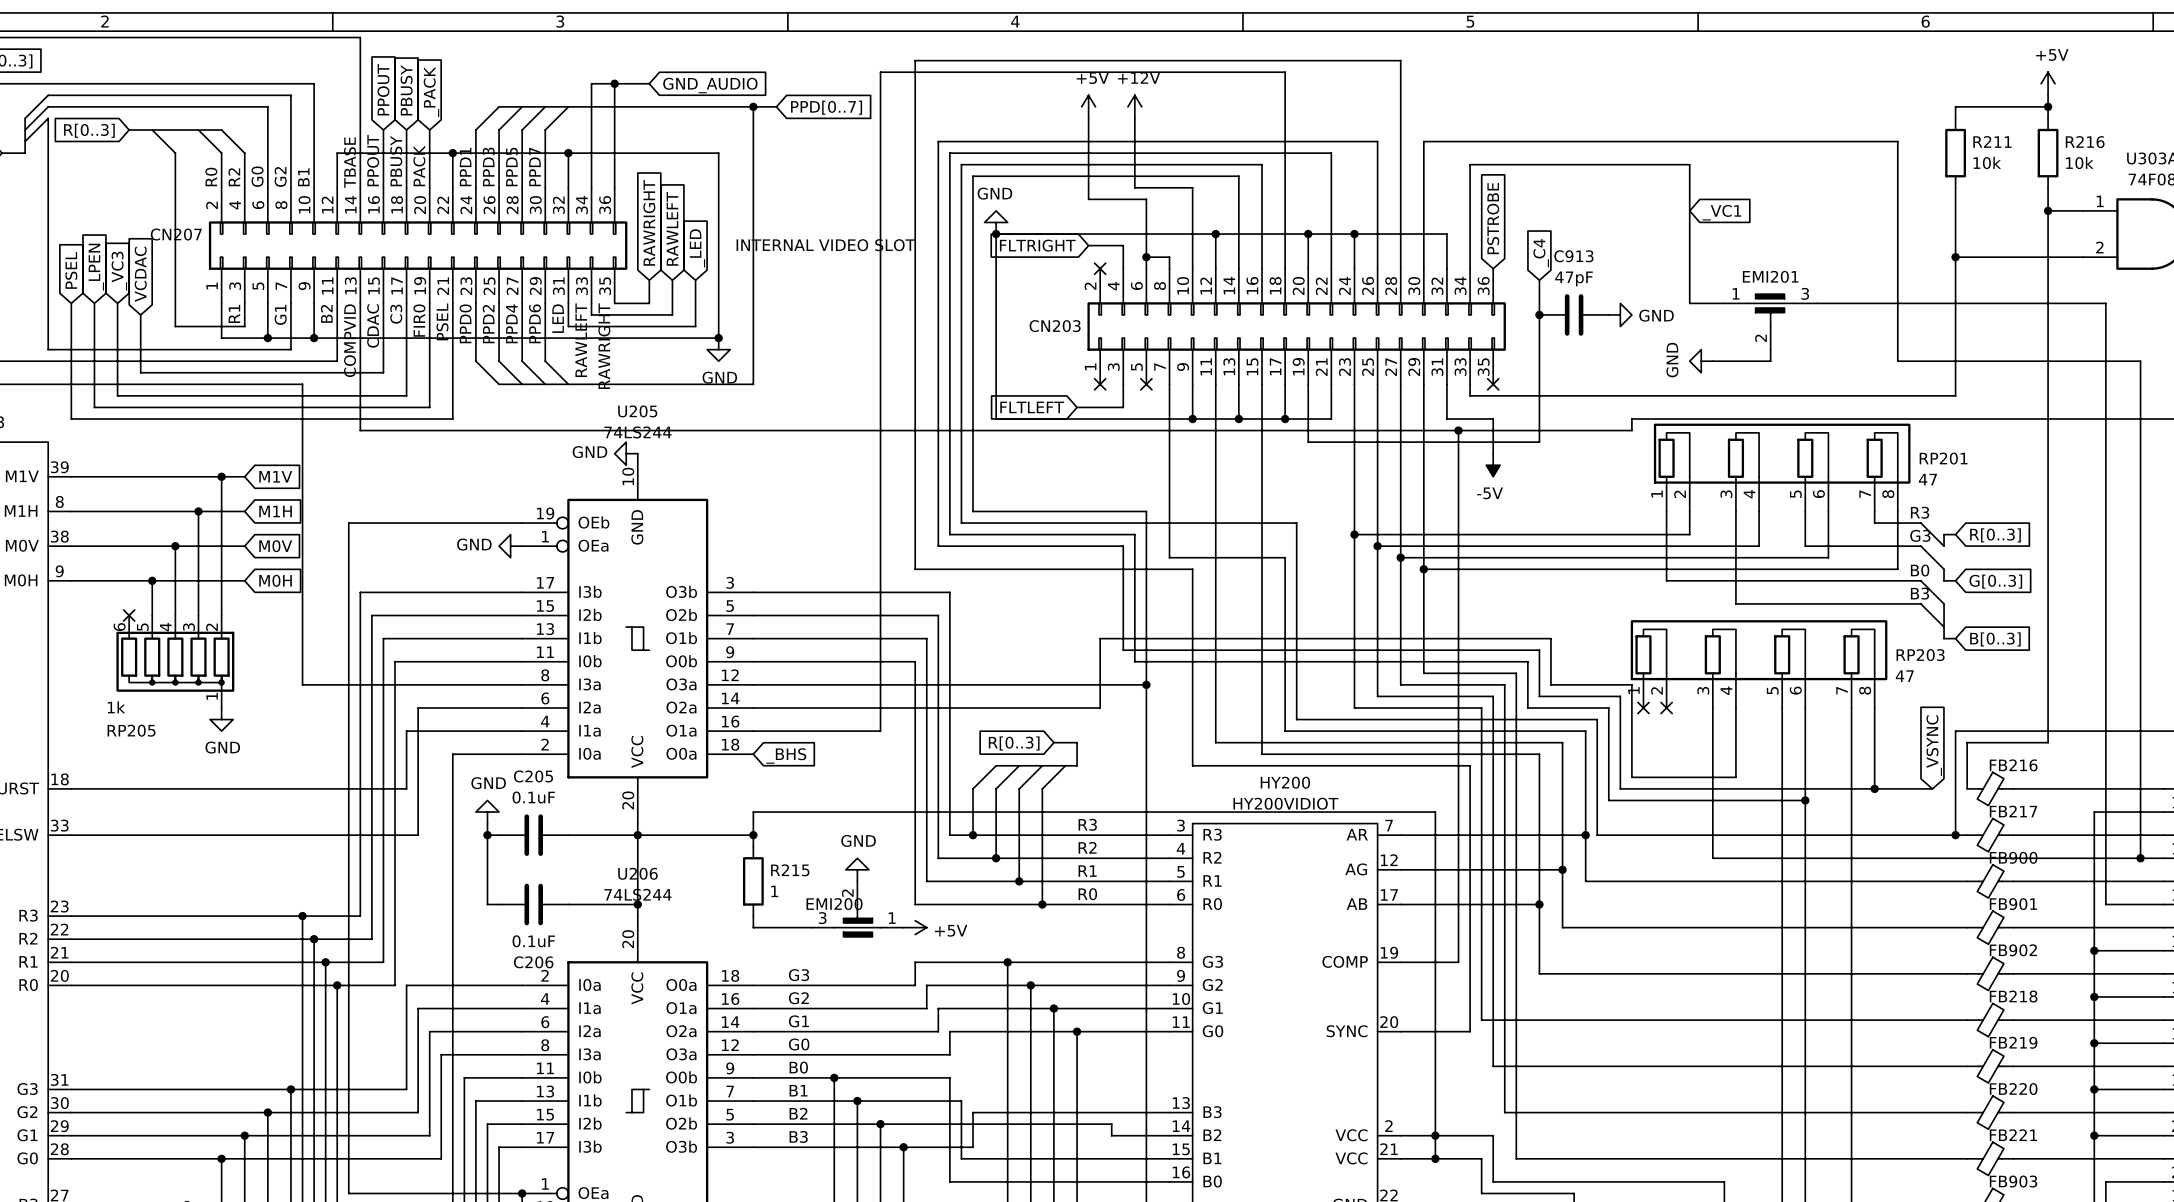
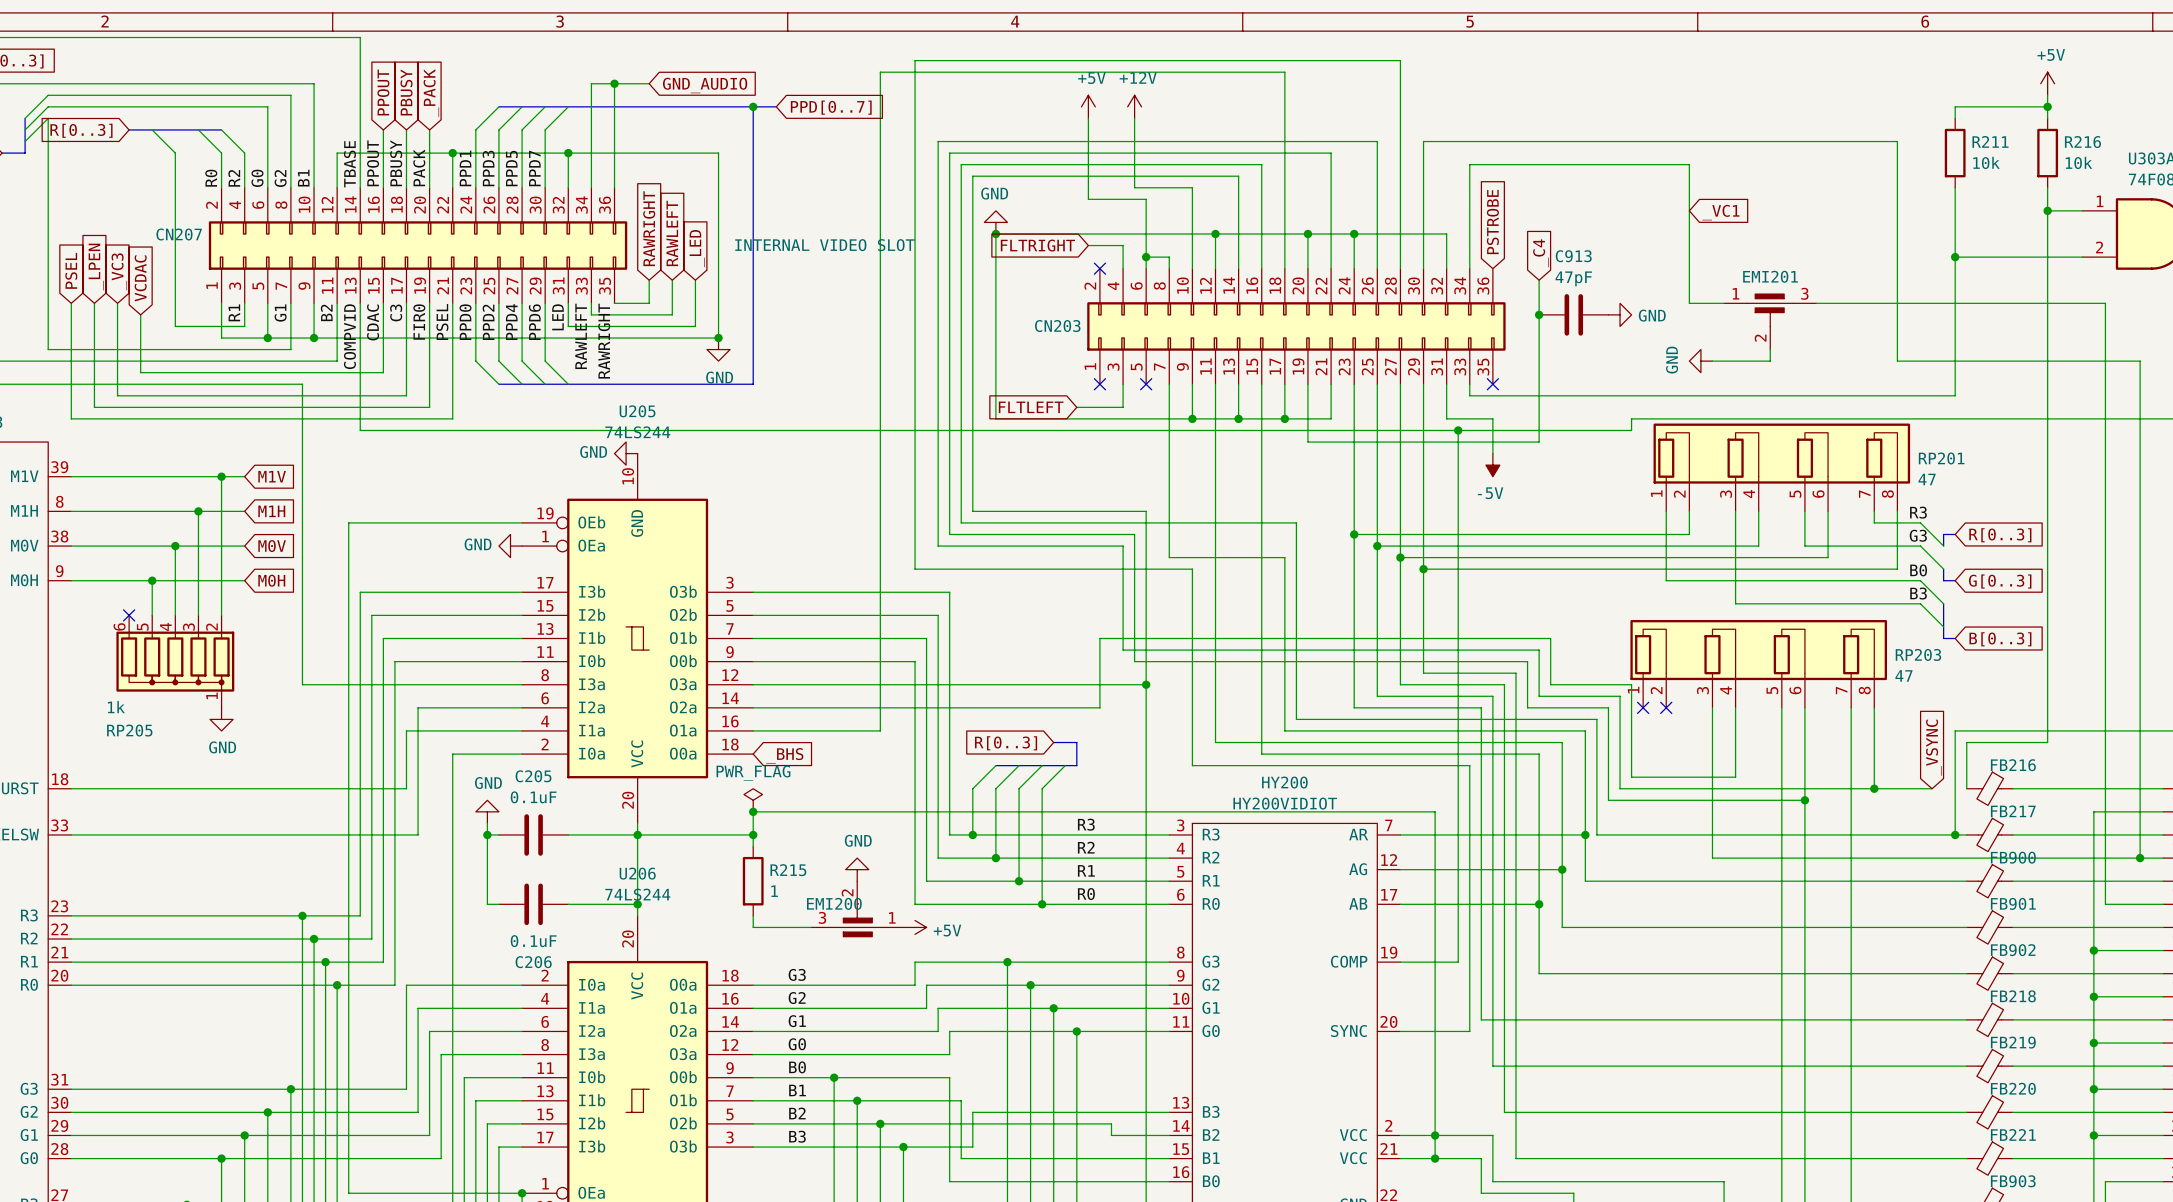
power symbol: none -> PWR_FLAG (753, 800)
junction: none -> (753, 811)

